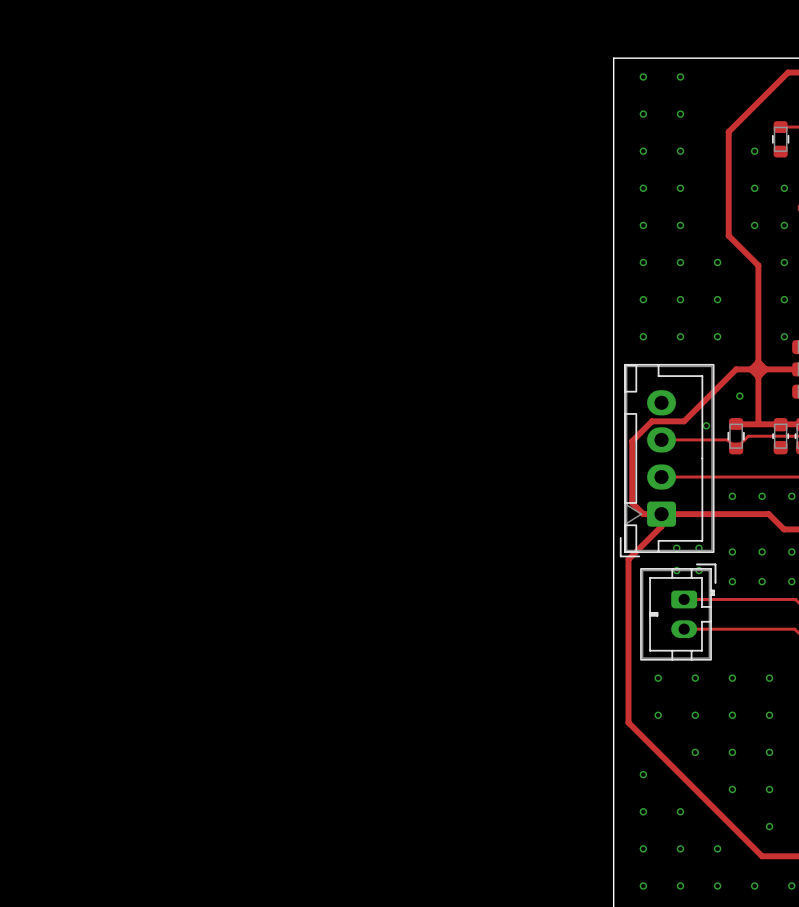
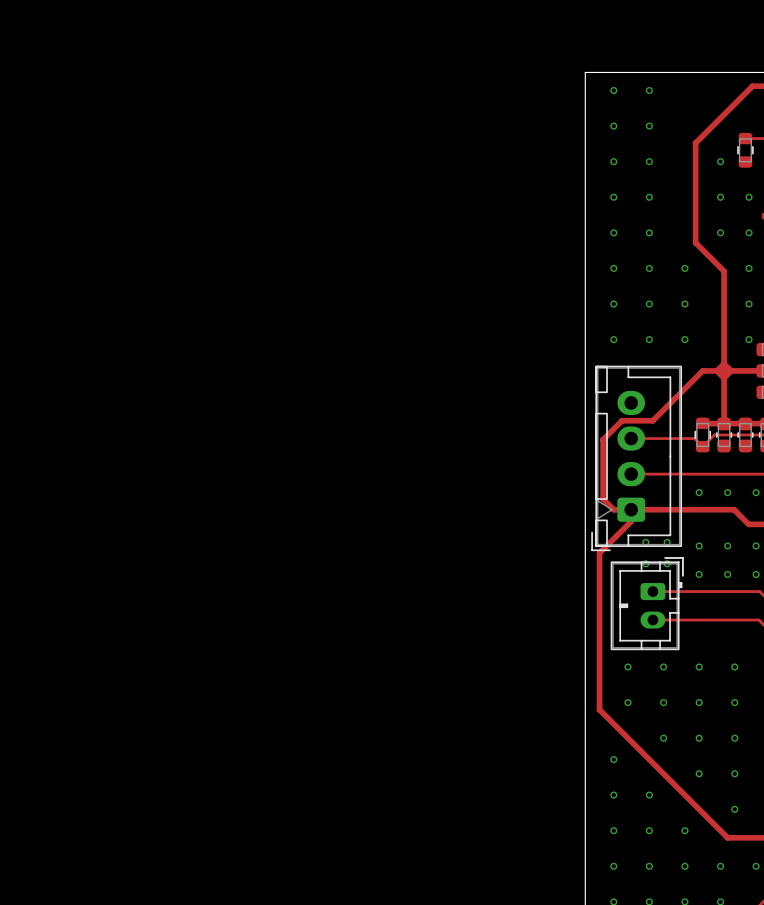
via: (739, 396) -> none
via: (706, 425) -> none
part: none -> (724, 434)

